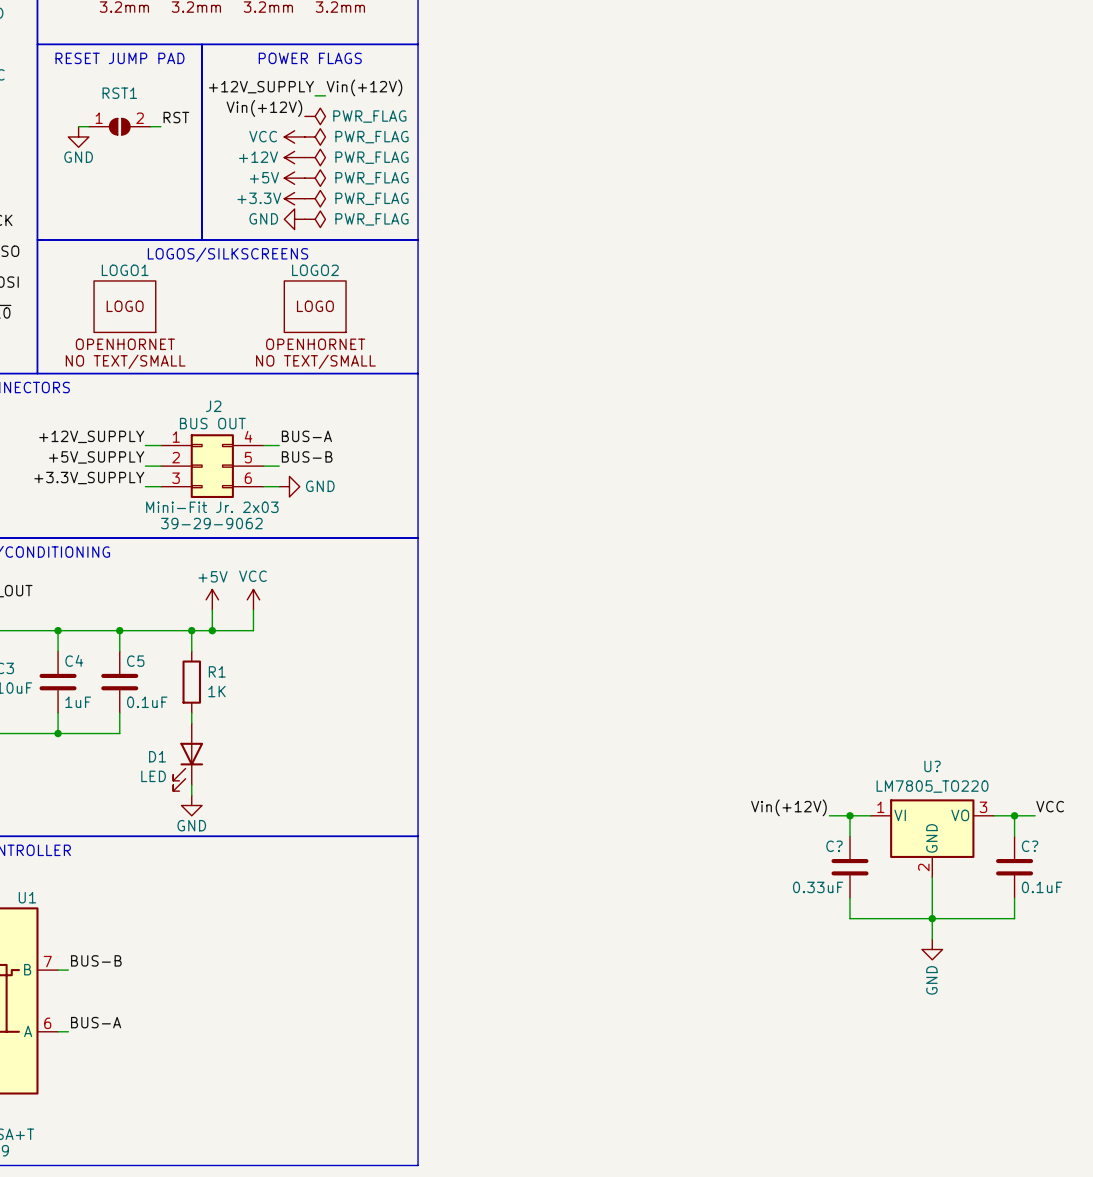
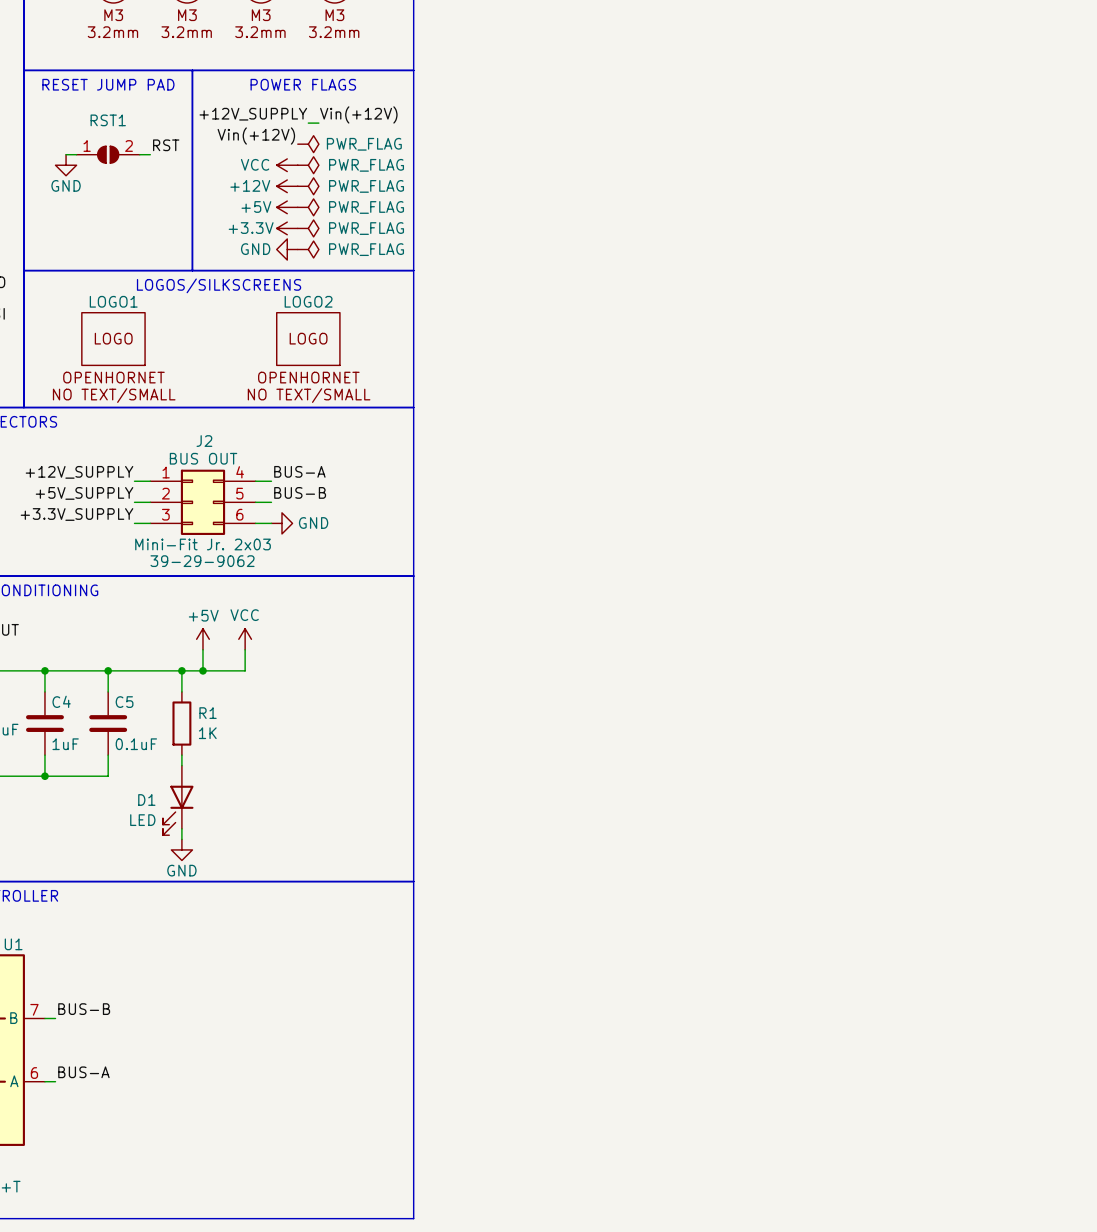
label: VCC (1050, 806) -> none
label: Vin(+12V) (788, 807) -> none
wire: (829, 815) (870, 815) -> none
wire: (849, 815) (849, 836) -> none
junction: (849, 815) -> none
wire: (993, 815) (1035, 815) -> none
wire: (1014, 815) (1014, 836) -> none
junction: (1014, 815) -> none
U?: LM7805_TO220 (932, 838) -> none
C?: 0.33uF (849, 867) -> none
C?: 0.1uF (1014, 867) -> none
wire: (932, 877) (932, 939) -> none
wire: (849, 898) (849, 918) (1014, 918) (1014, 898) -> none
junction: (932, 918) -> none
power symbol: GND (932, 949) -> none

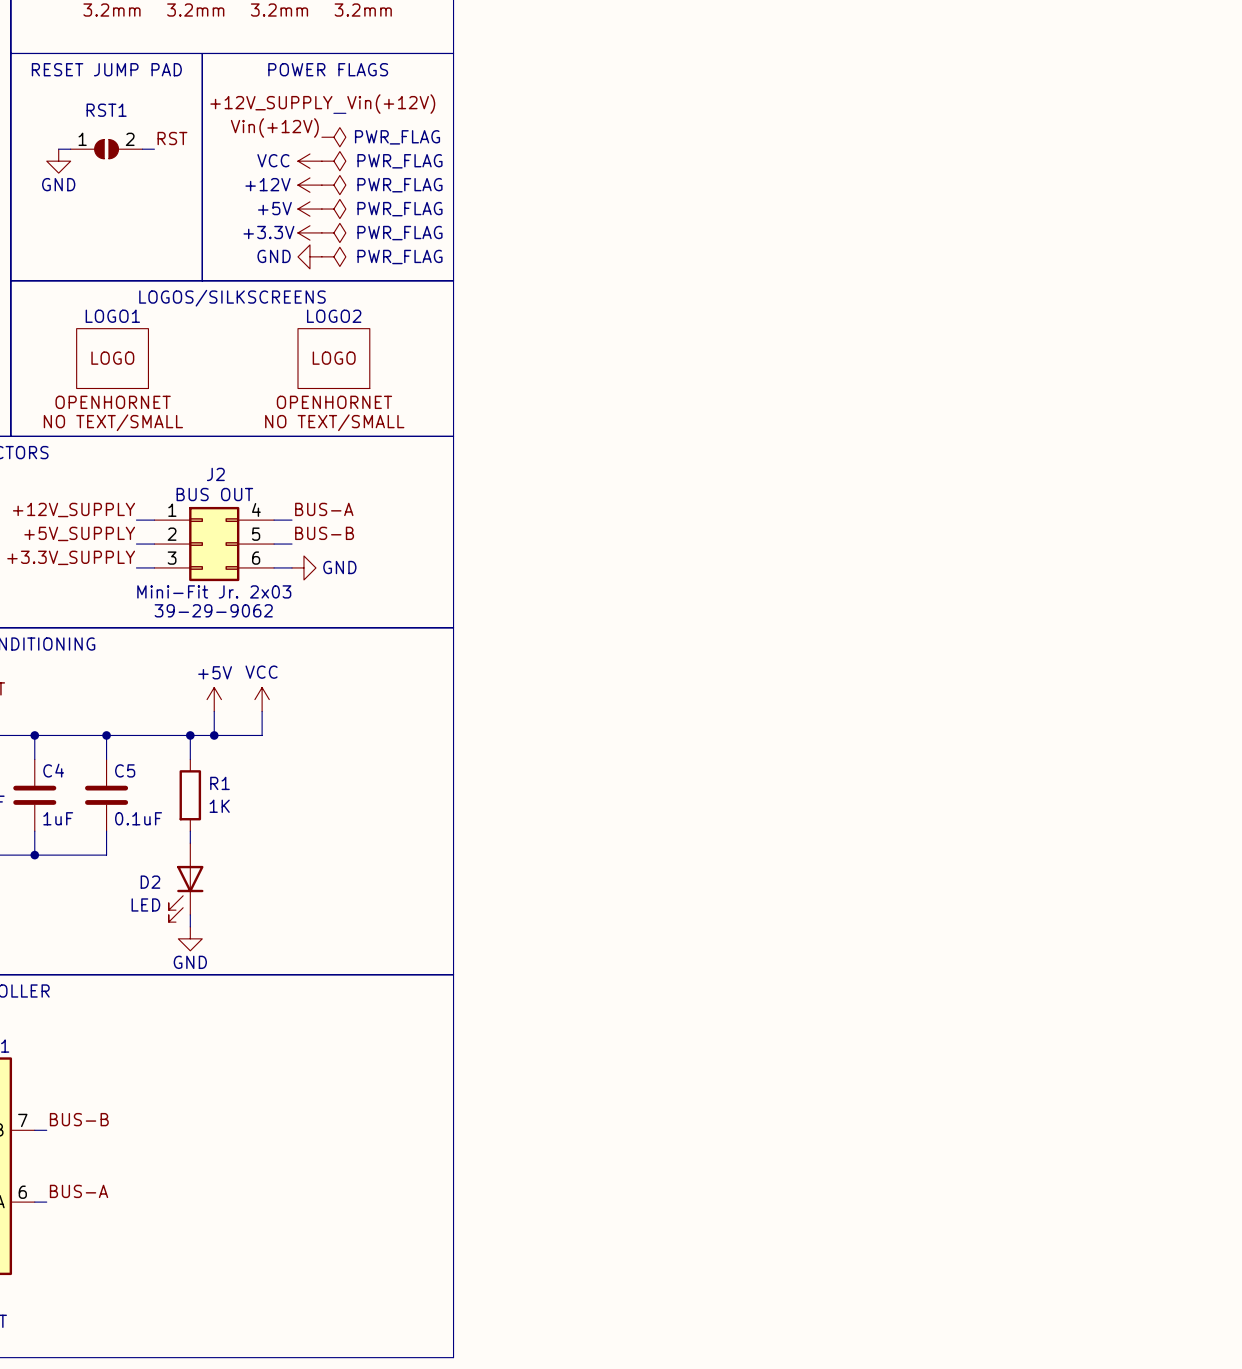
D1 name: D1 (146, 800) -> D2 (150, 882)

